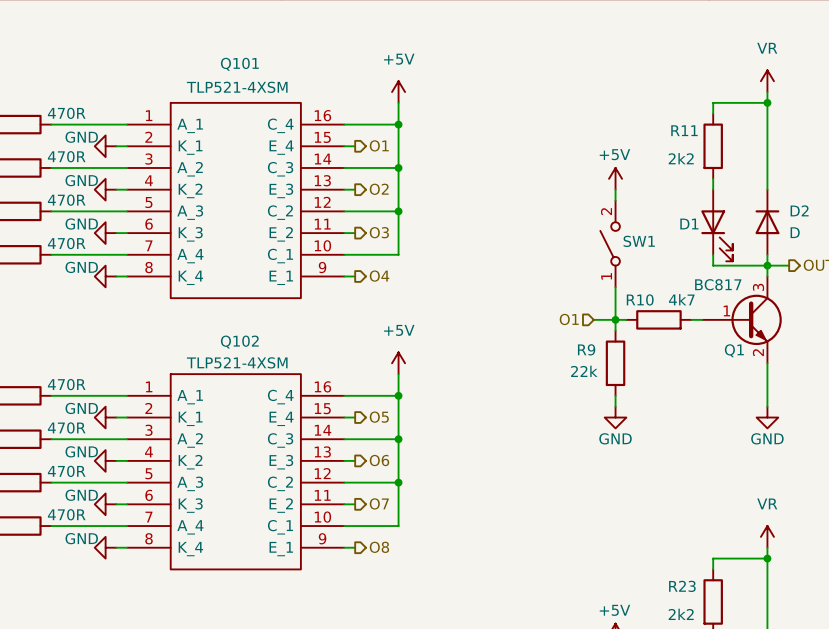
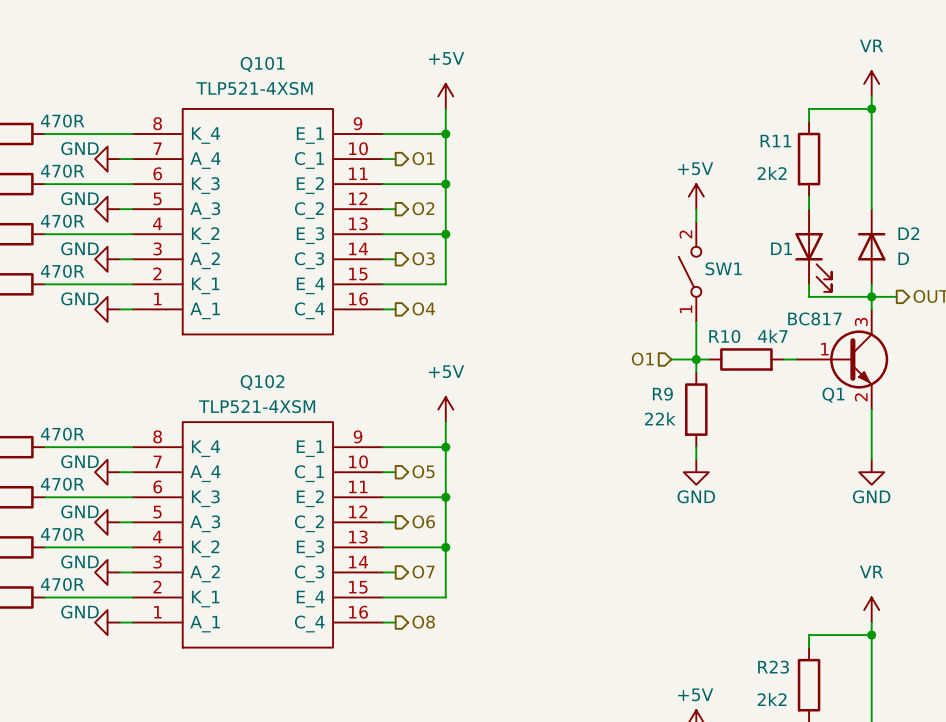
Q101 flip: as is (235, 200) -> up-down (257, 221)
Q102 flip: as is (235, 471) -> up-down (257, 534)

